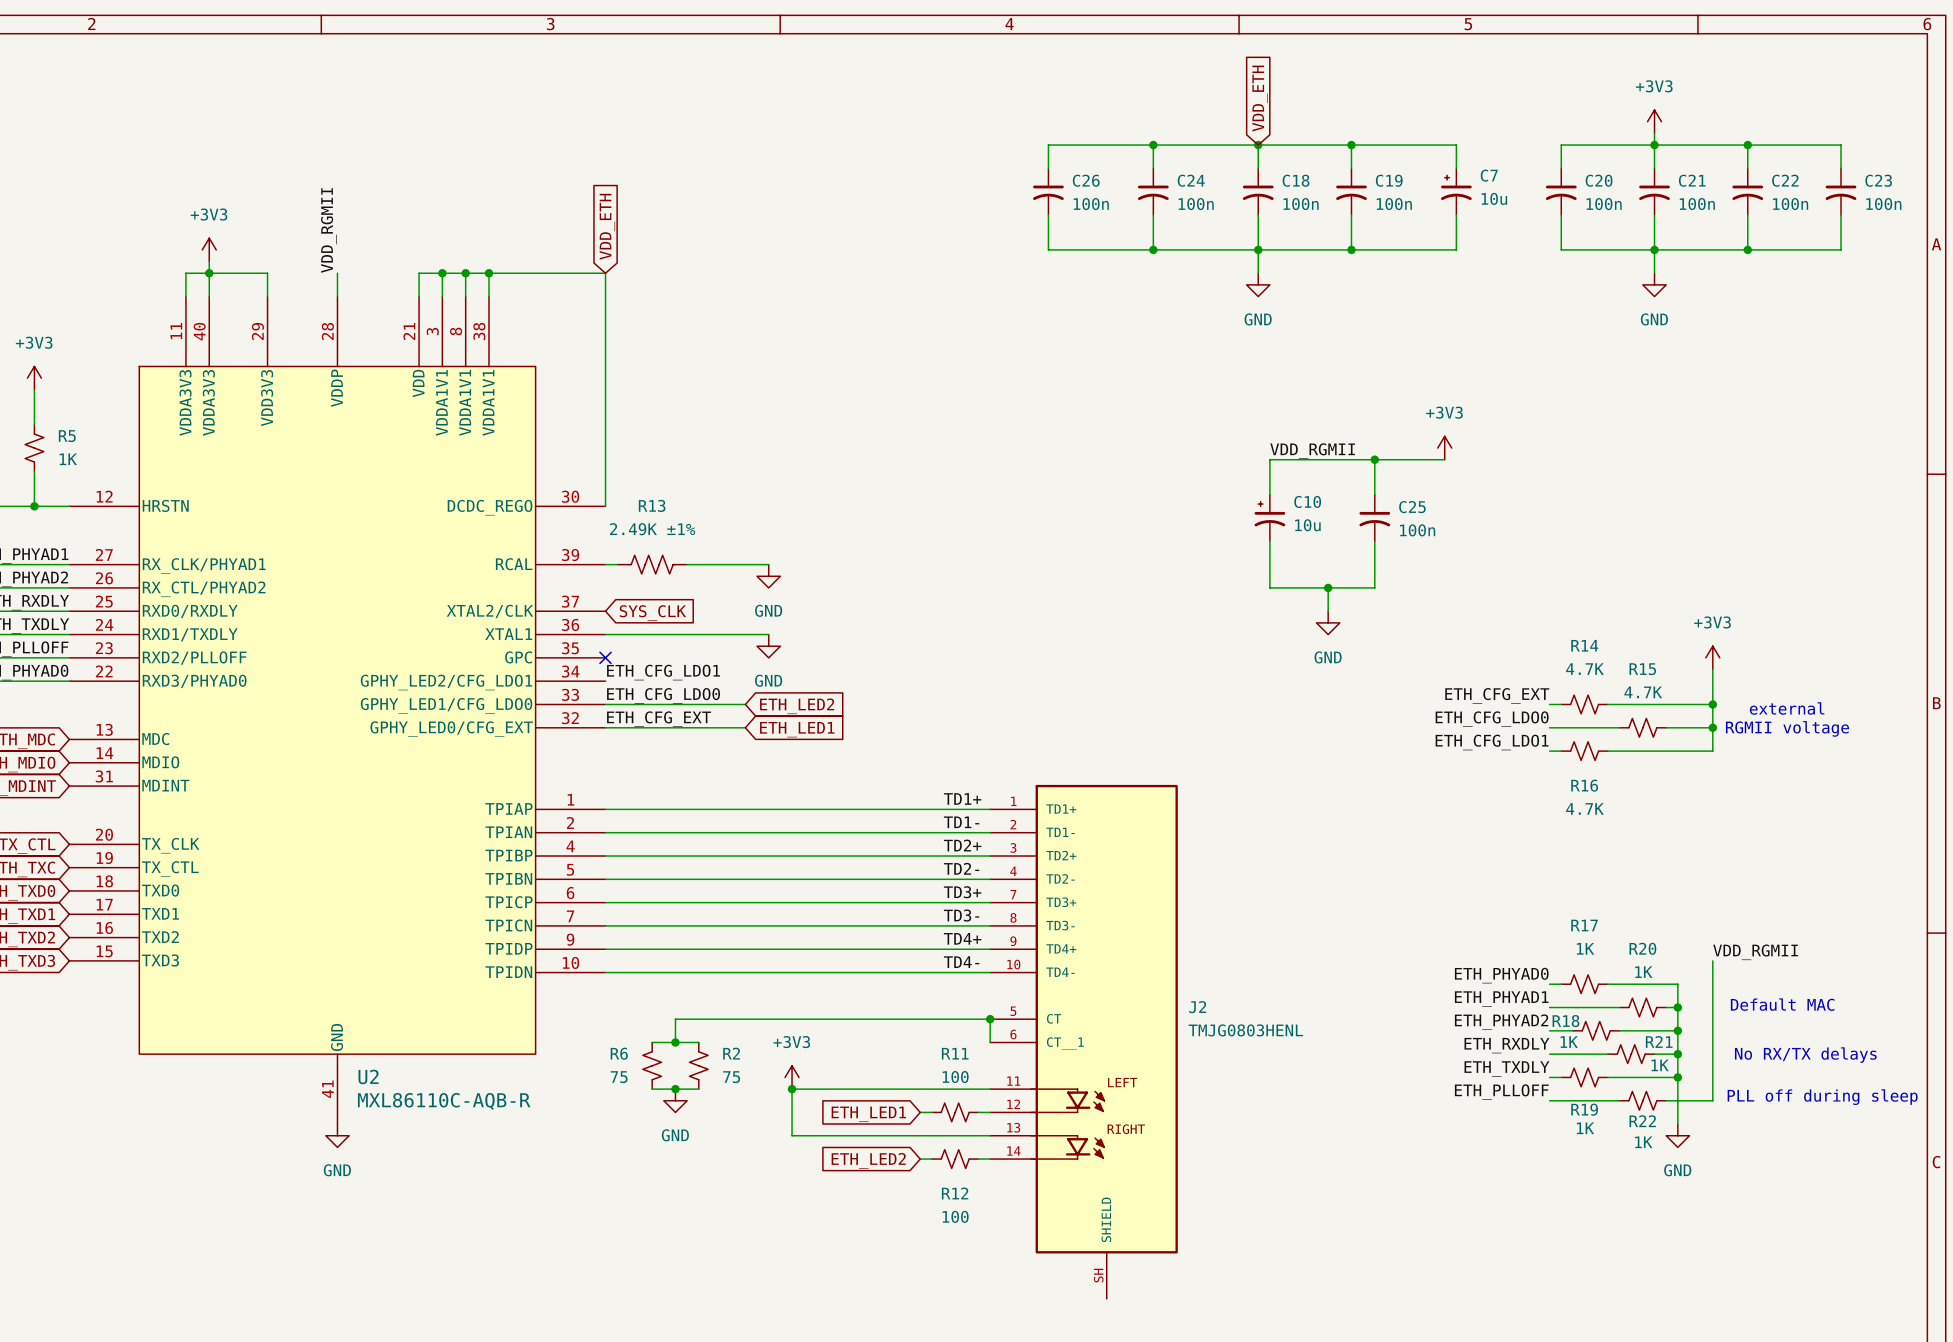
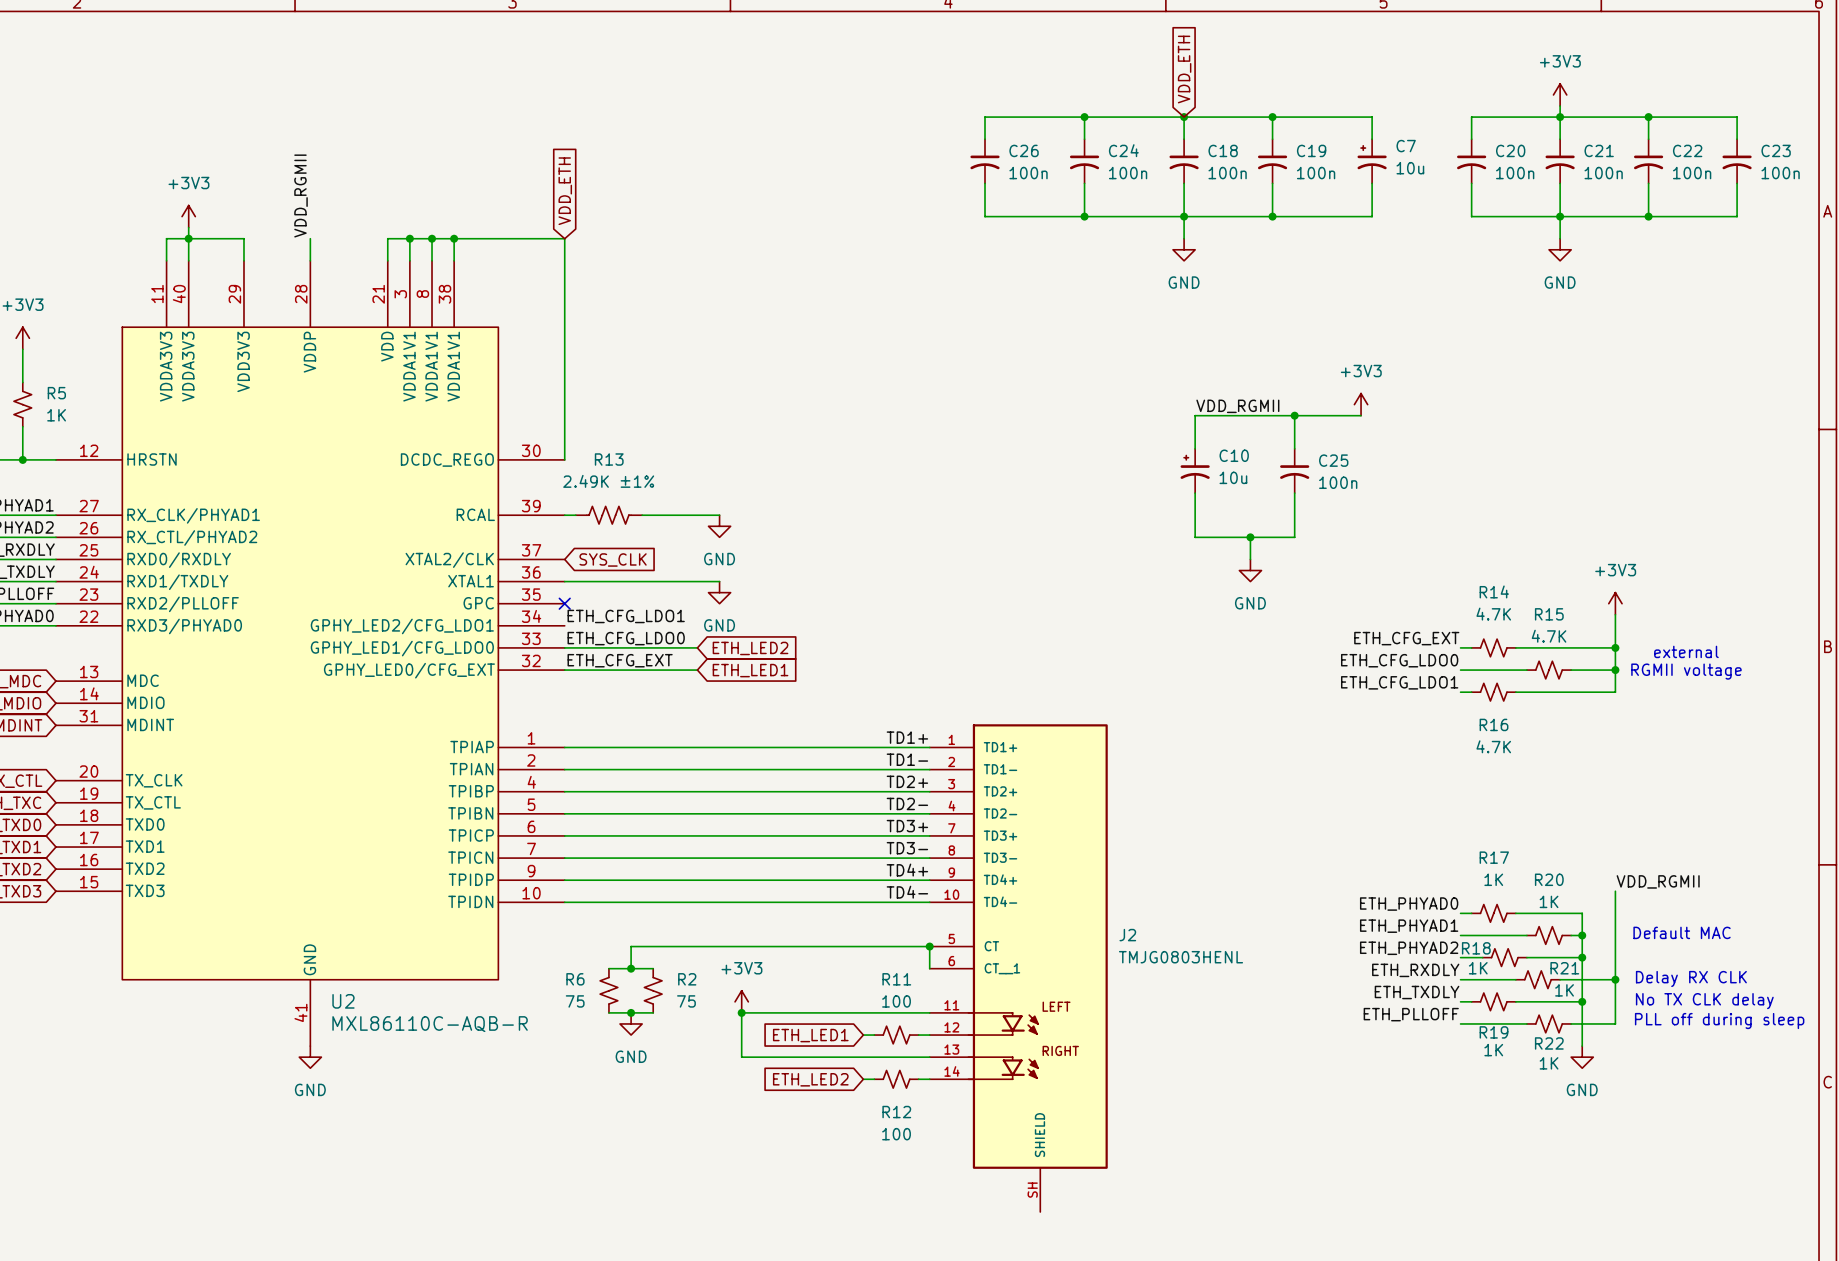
text: none -> Delay RX CLK (1691, 978)
wire: none -> (1582, 979) (1615, 979)
junction position: (1677, 1054) -> (1615, 979)
text: No RX/TX delays (1805, 1055) -> No TX CLK delay (1704, 1001)

